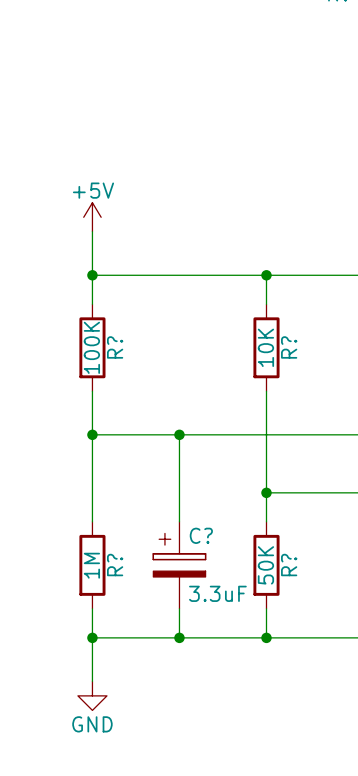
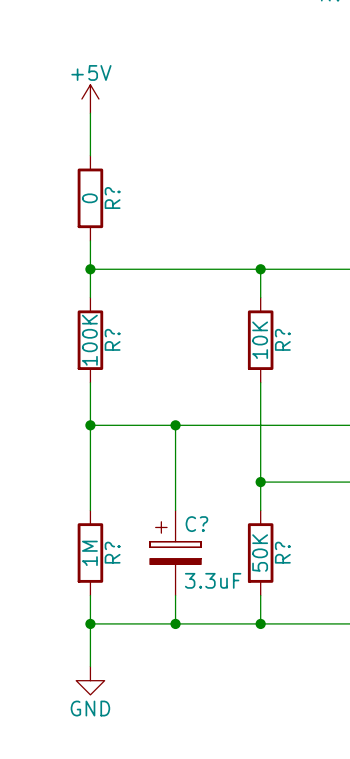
wire: none -> (90, 113) (90, 155)
R?: none -> 0 (90, 198)
power symbol position: +5V (92, 217) -> +5V (90, 99)

